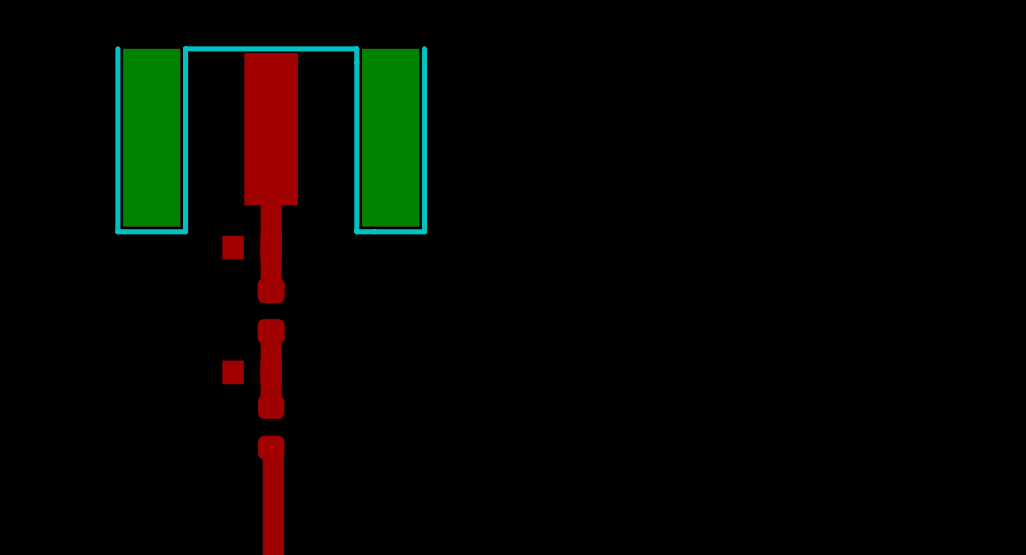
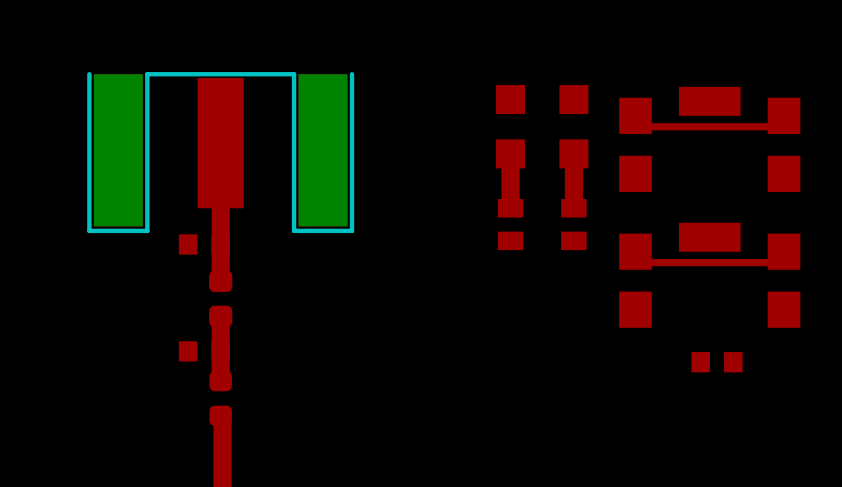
top track: none -> (784, 115) (773, 126) (646, 126) (635, 115)
part: none -> (510, 126)
part: none -> (573, 126)
part: none -> (709, 139)
top track: none -> (510, 153) (510, 208)
top track: none -> (573, 153) (573, 208)
part: none -> (510, 224)
part: none -> (573, 224)
top track: none -> (784, 251) (773, 262) (646, 262) (635, 251)
part: none -> (709, 275)
part: none -> (716, 362)

